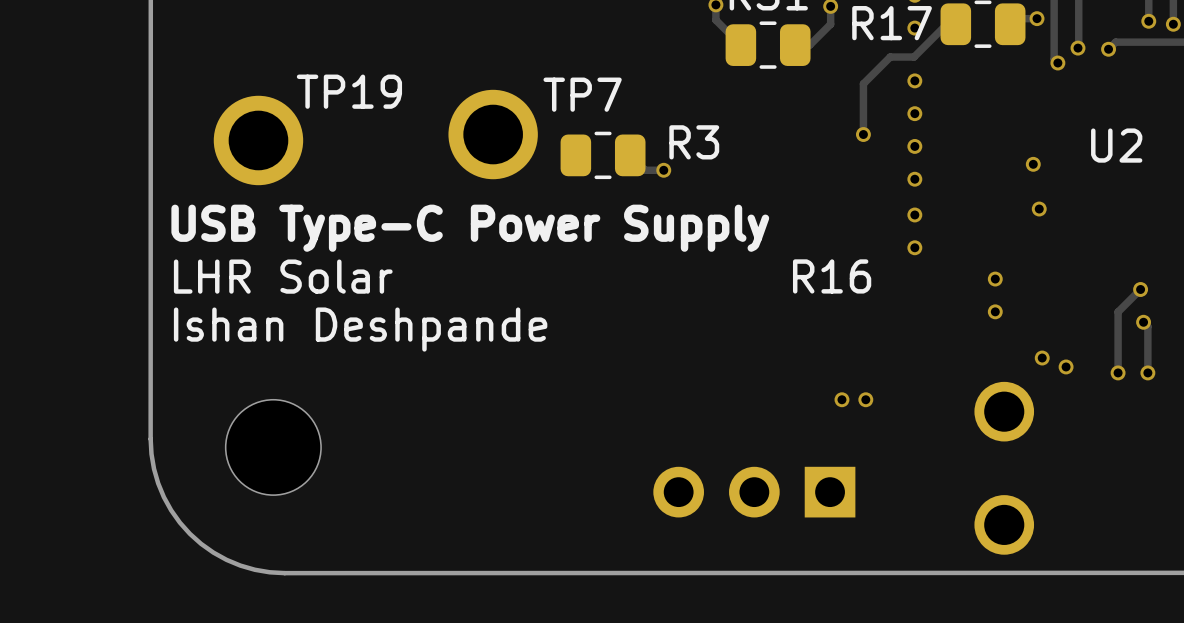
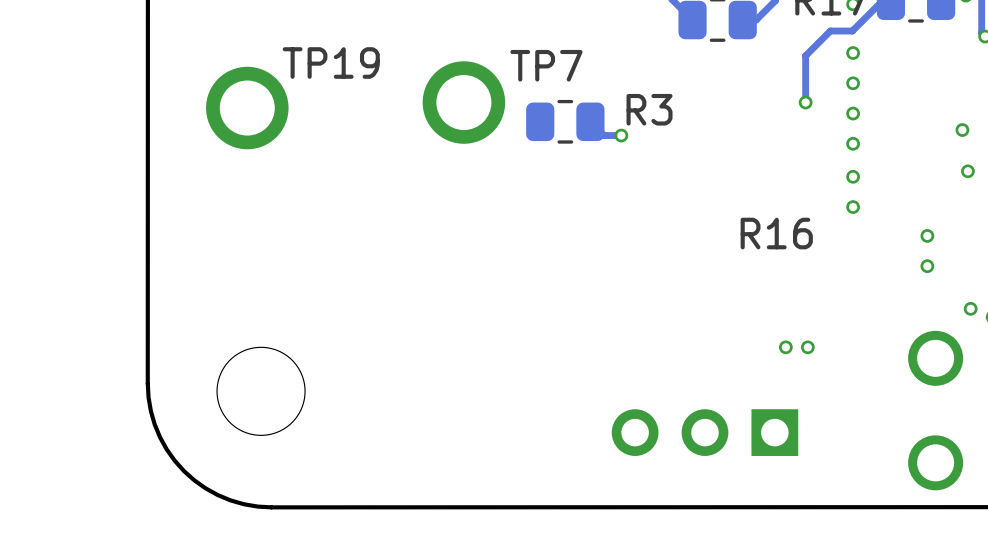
text: USB Type-C Power Supply (470, 228) -> none
text: LHR Solar (283, 276) -> none
text: Ishan Deshpande (360, 329) -> none

